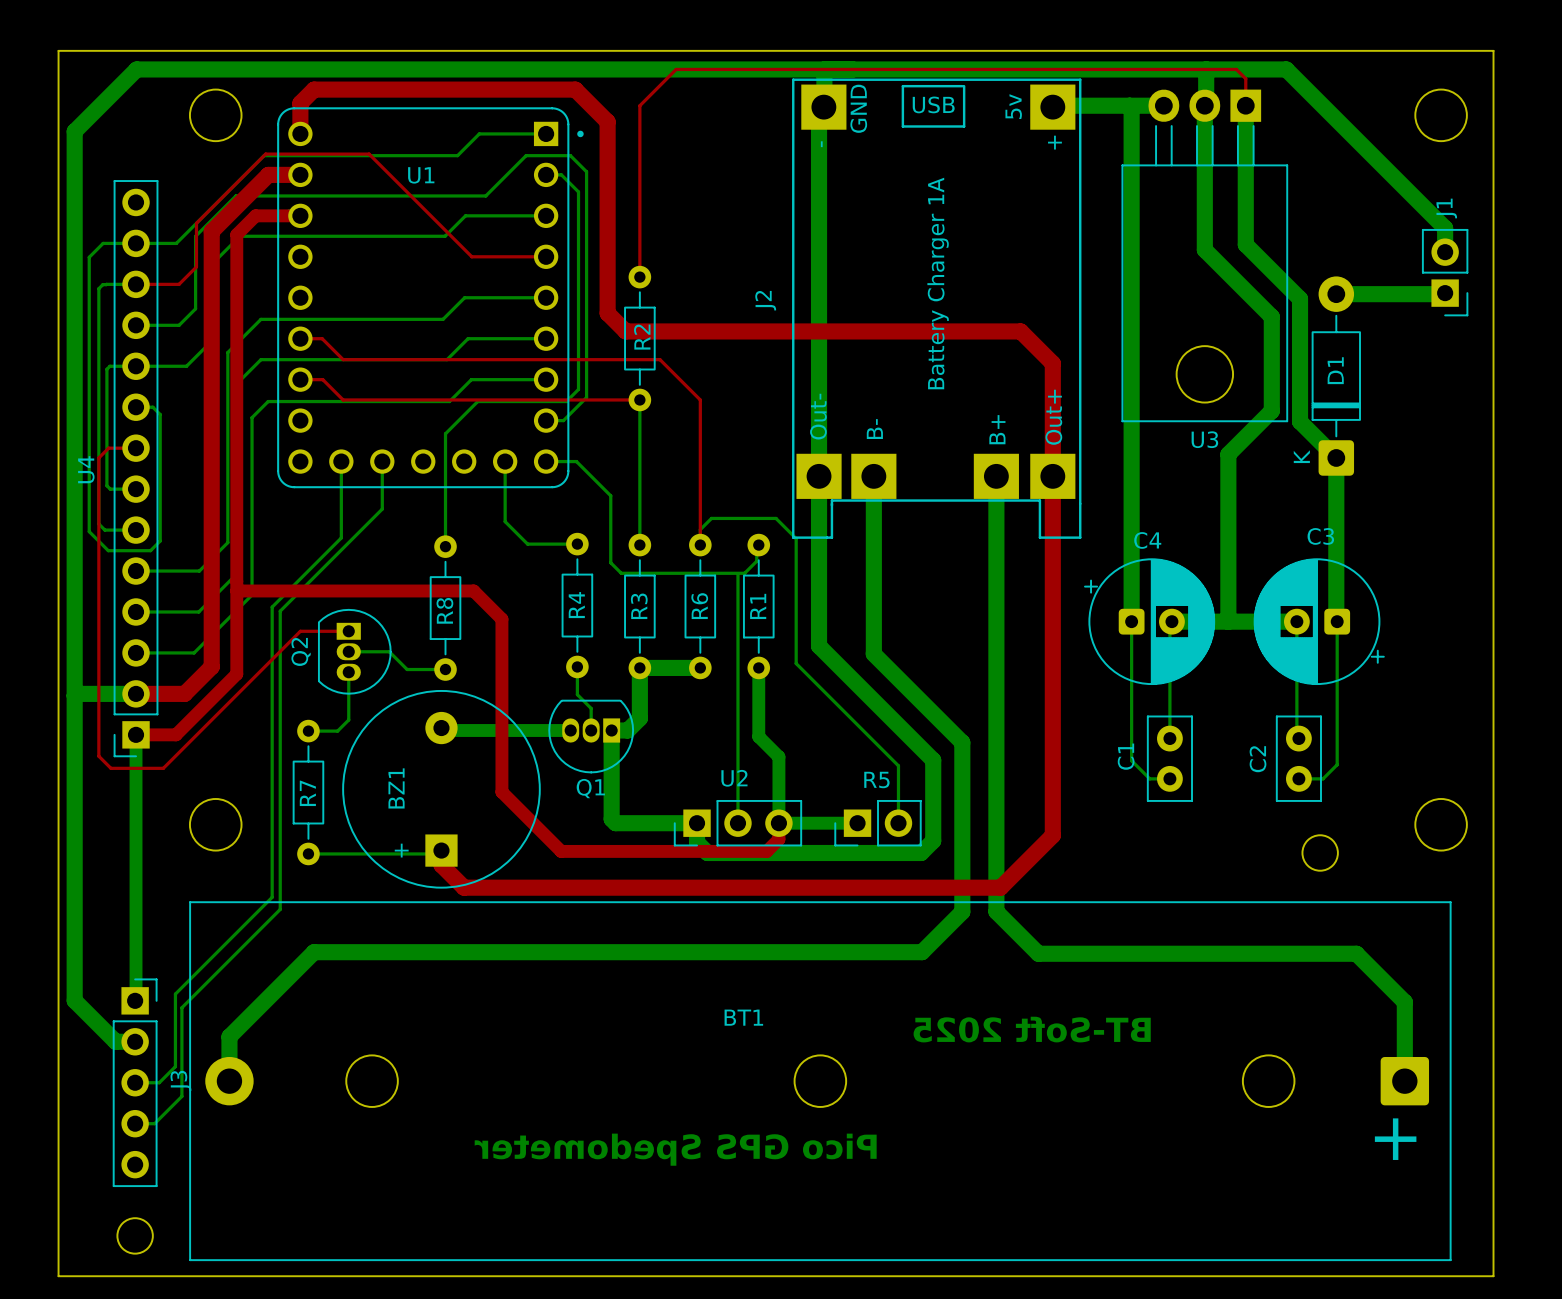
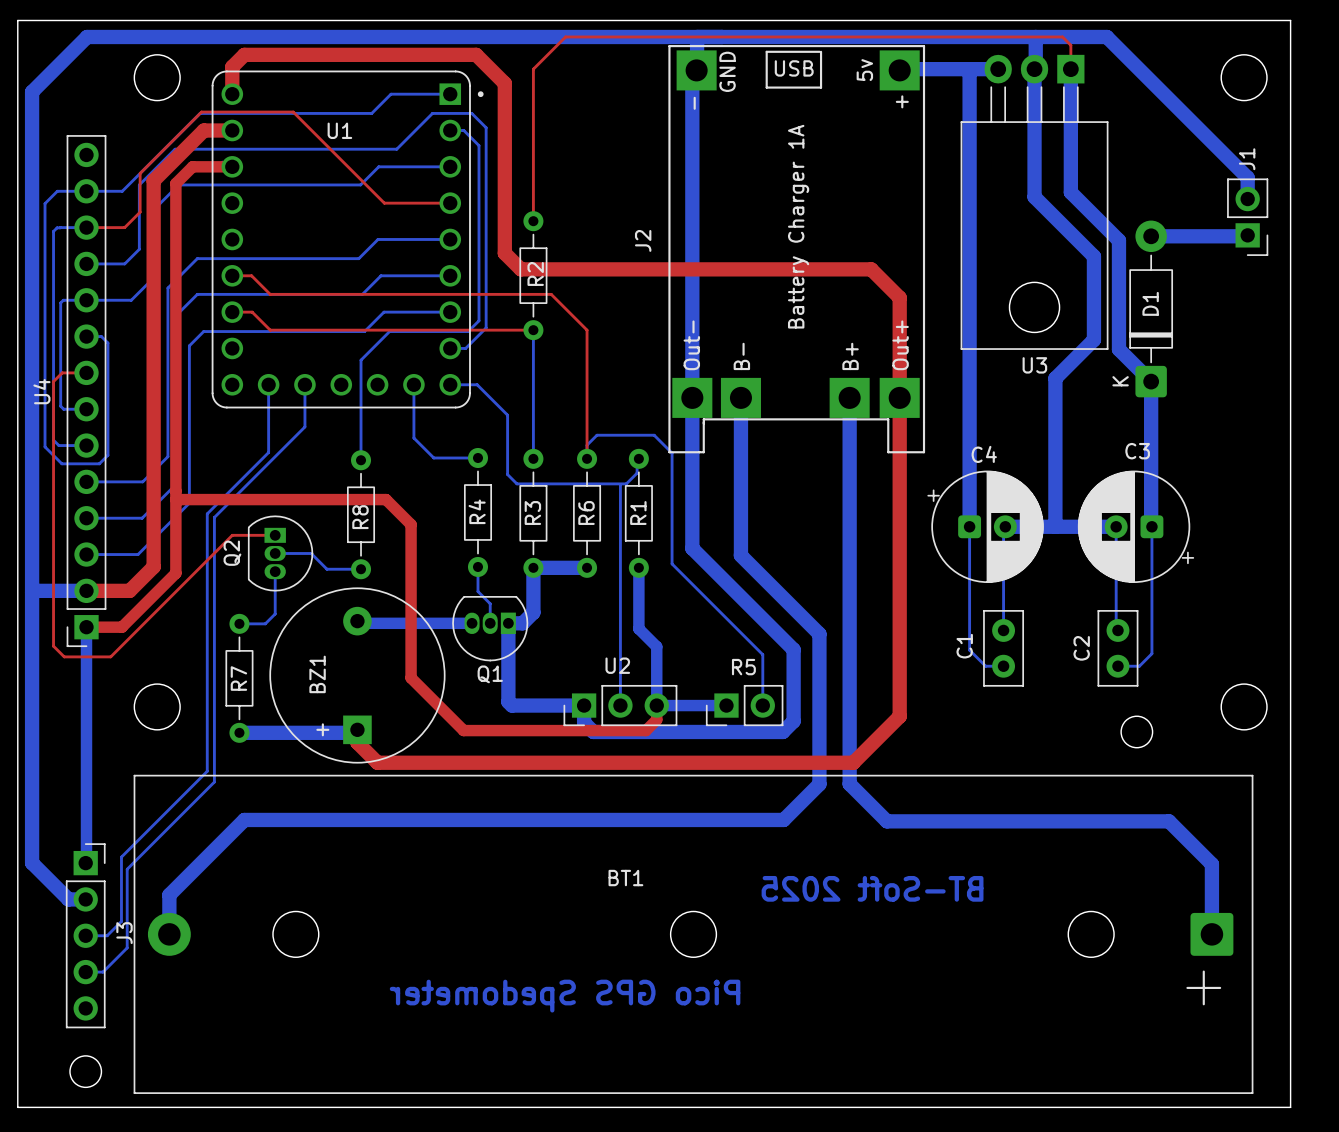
bottom track width: thin (308, 853) (438, 853) -> thick (239, 732) (354, 732)

